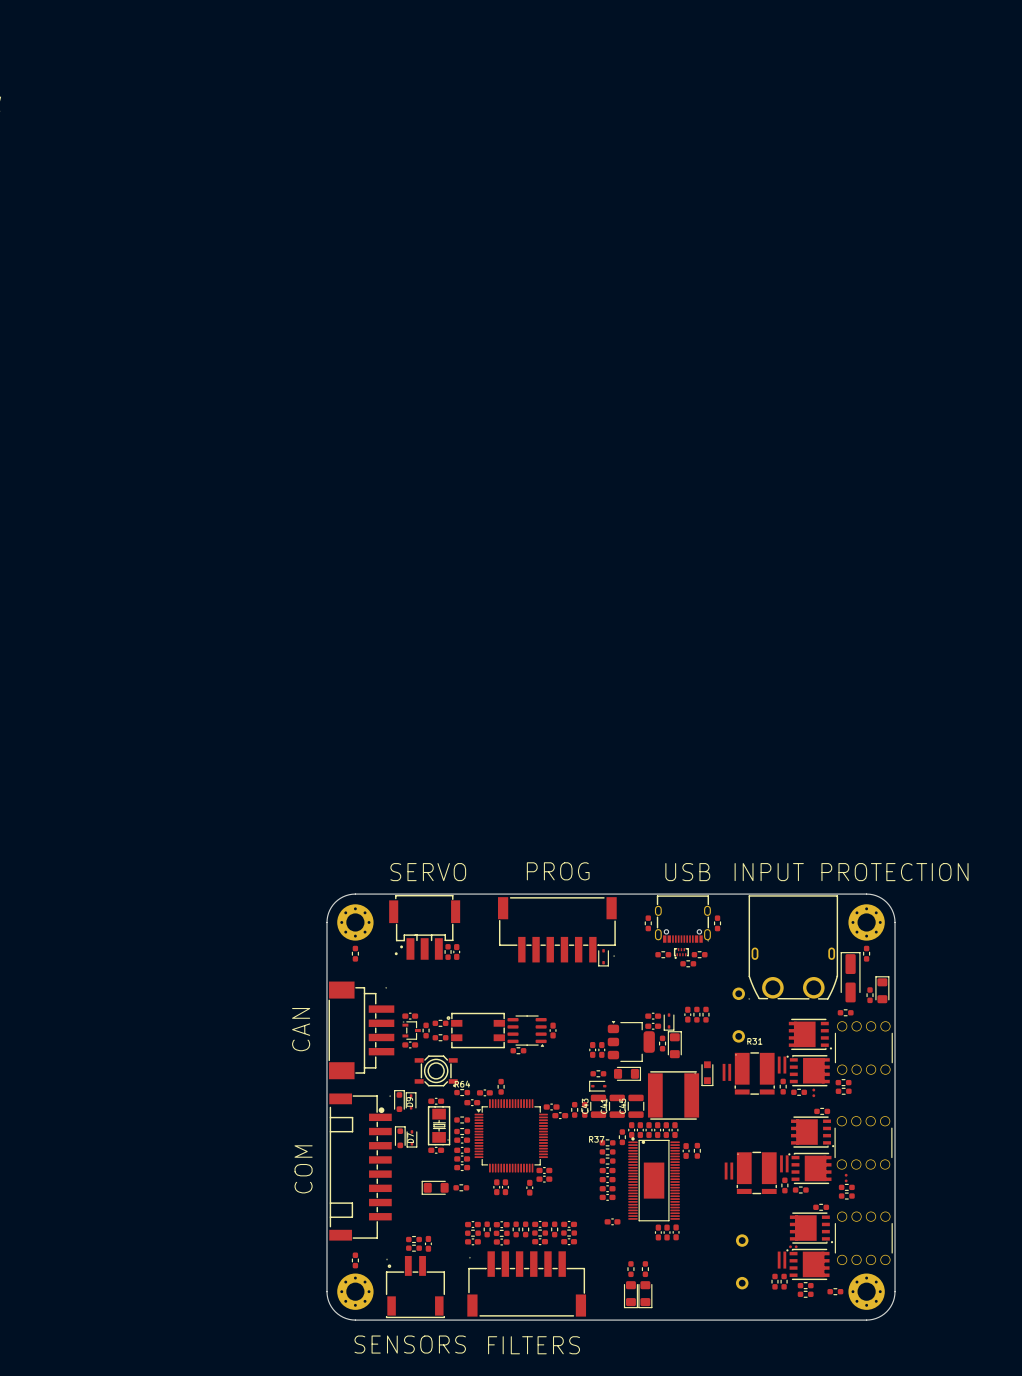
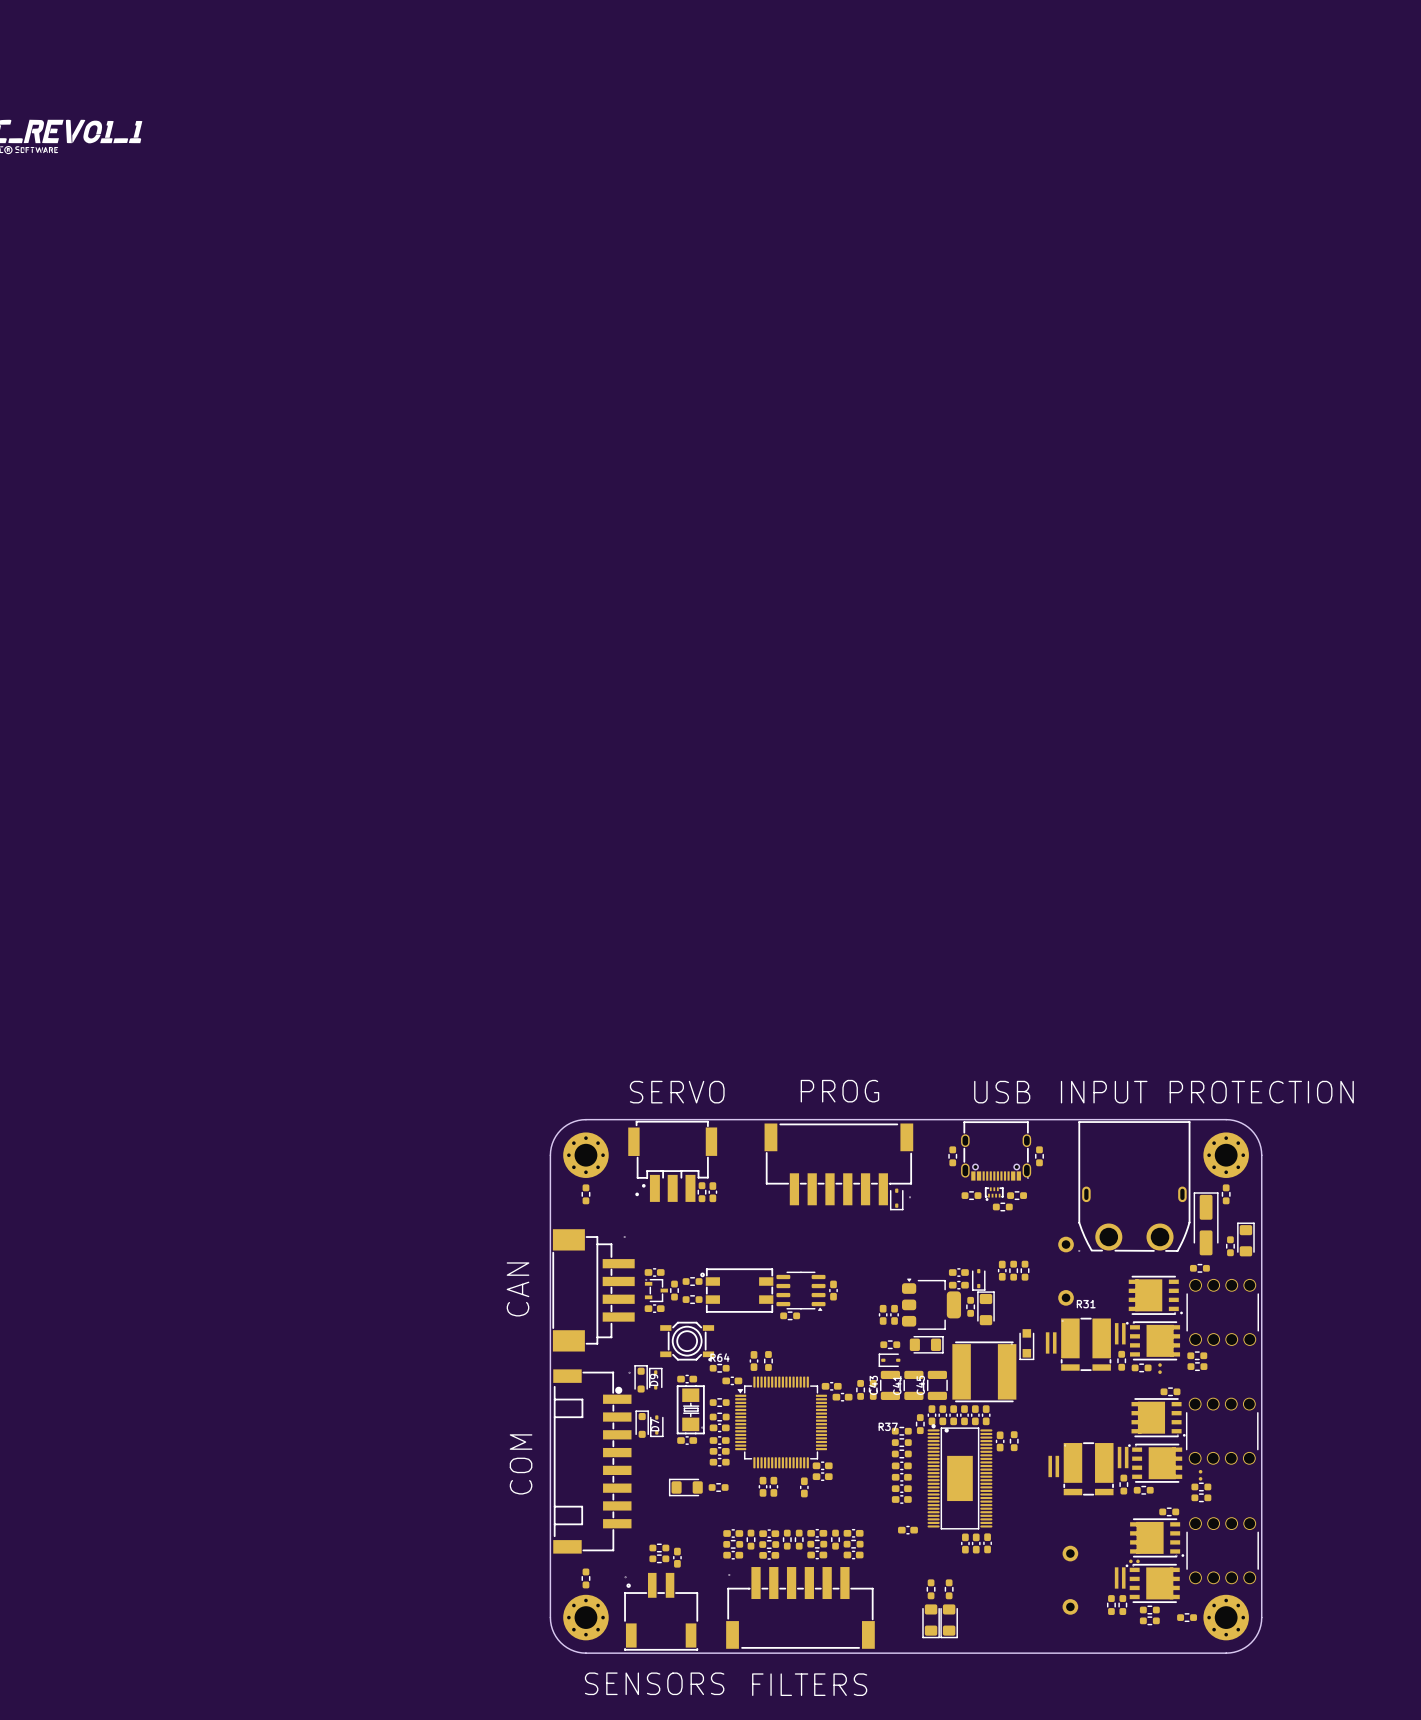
part rotation: 0° (484, 1092) -> 90° clockwise (754, 1361)
part: none -> (659, 1547)
part: (413, 1239) -> none
part: none -> (659, 1558)
part: (413, 1248) -> none

